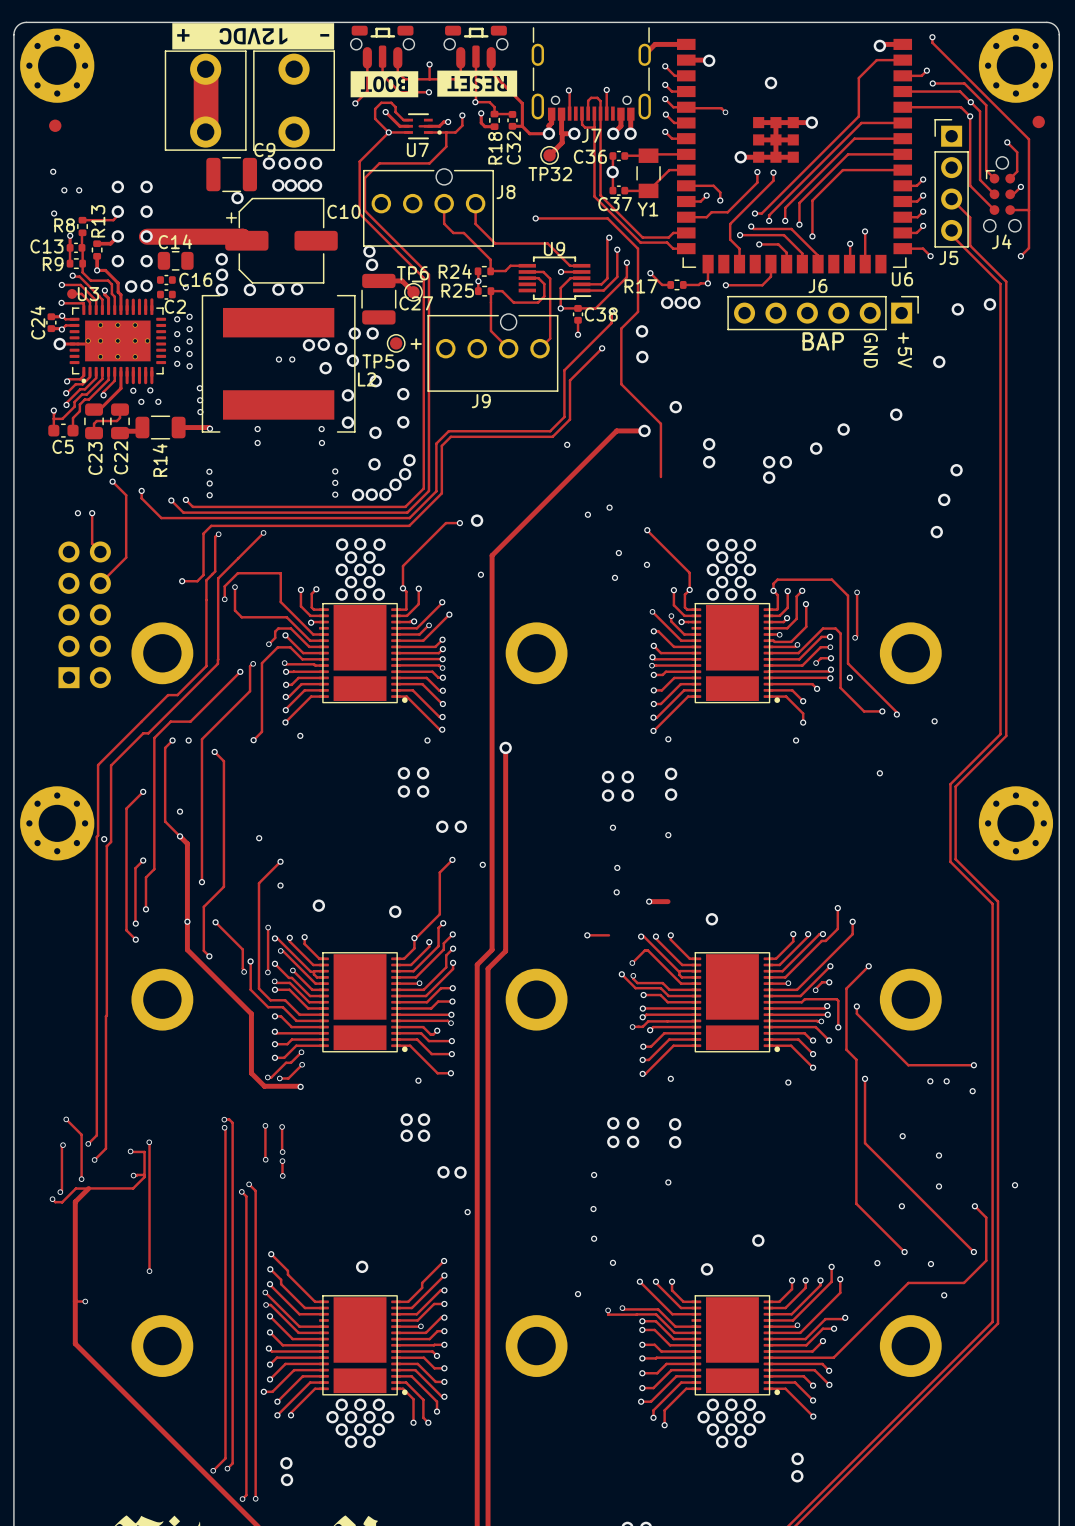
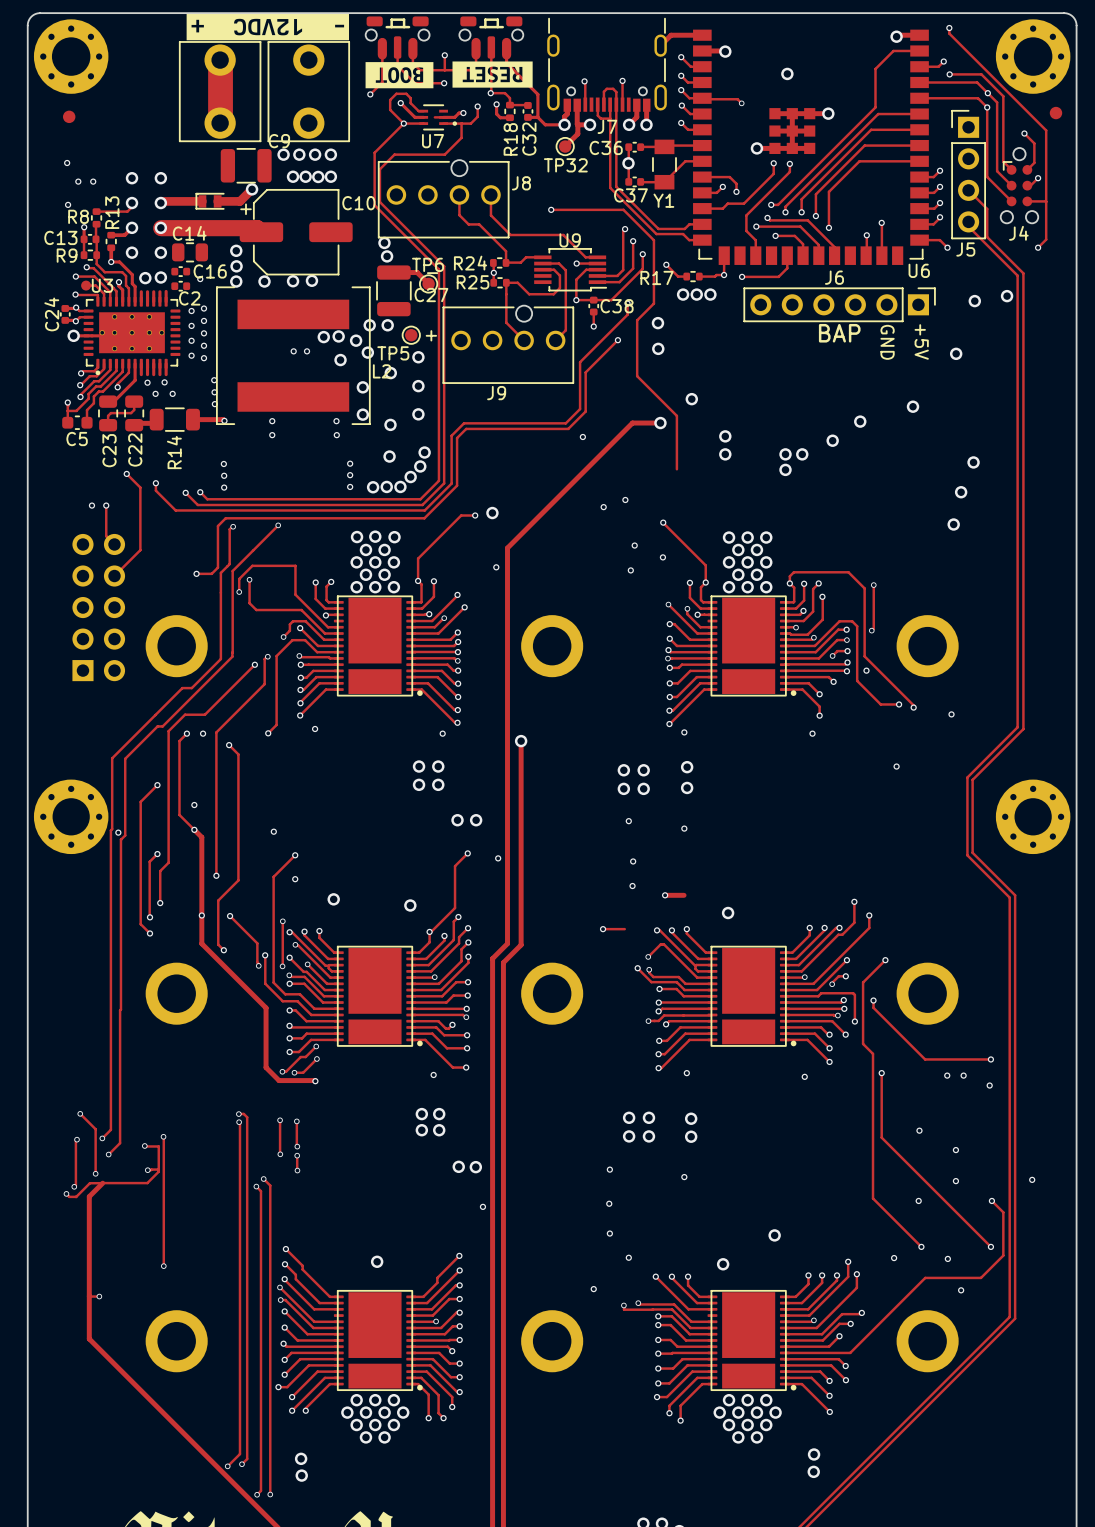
track: none -> (252, 189) (239, 201) (217, 201)
part: none -> (210, 201)
track: none -> (202, 201) (162, 201) (160, 203)

